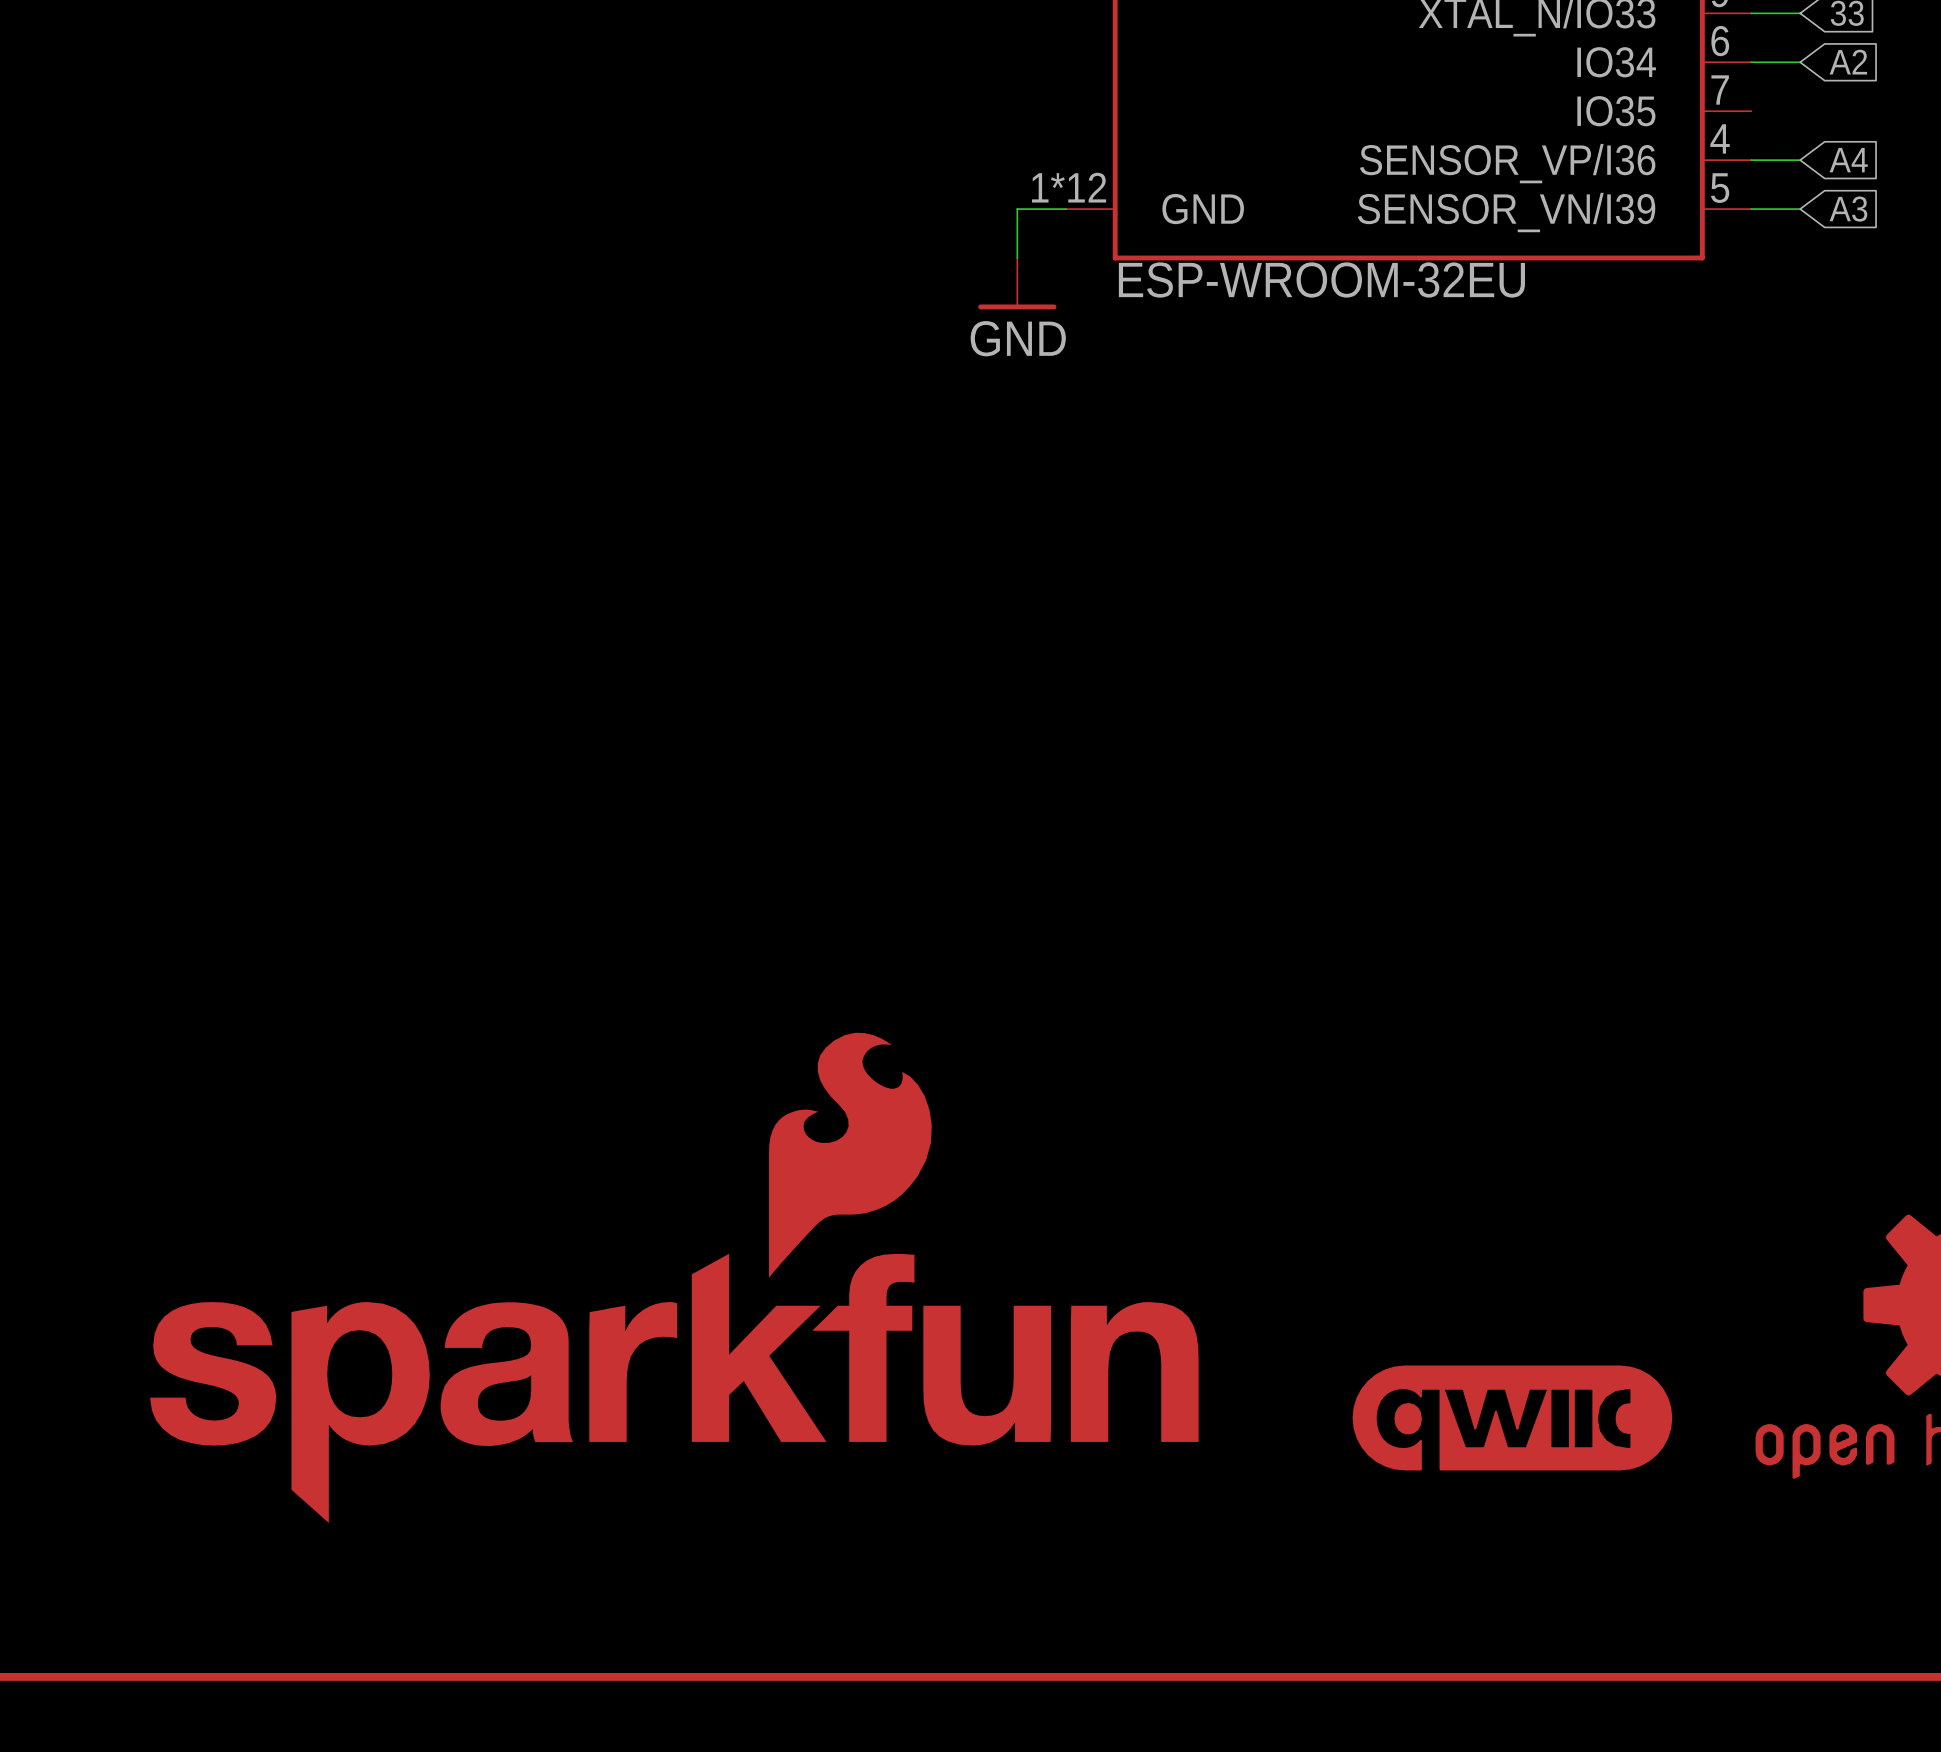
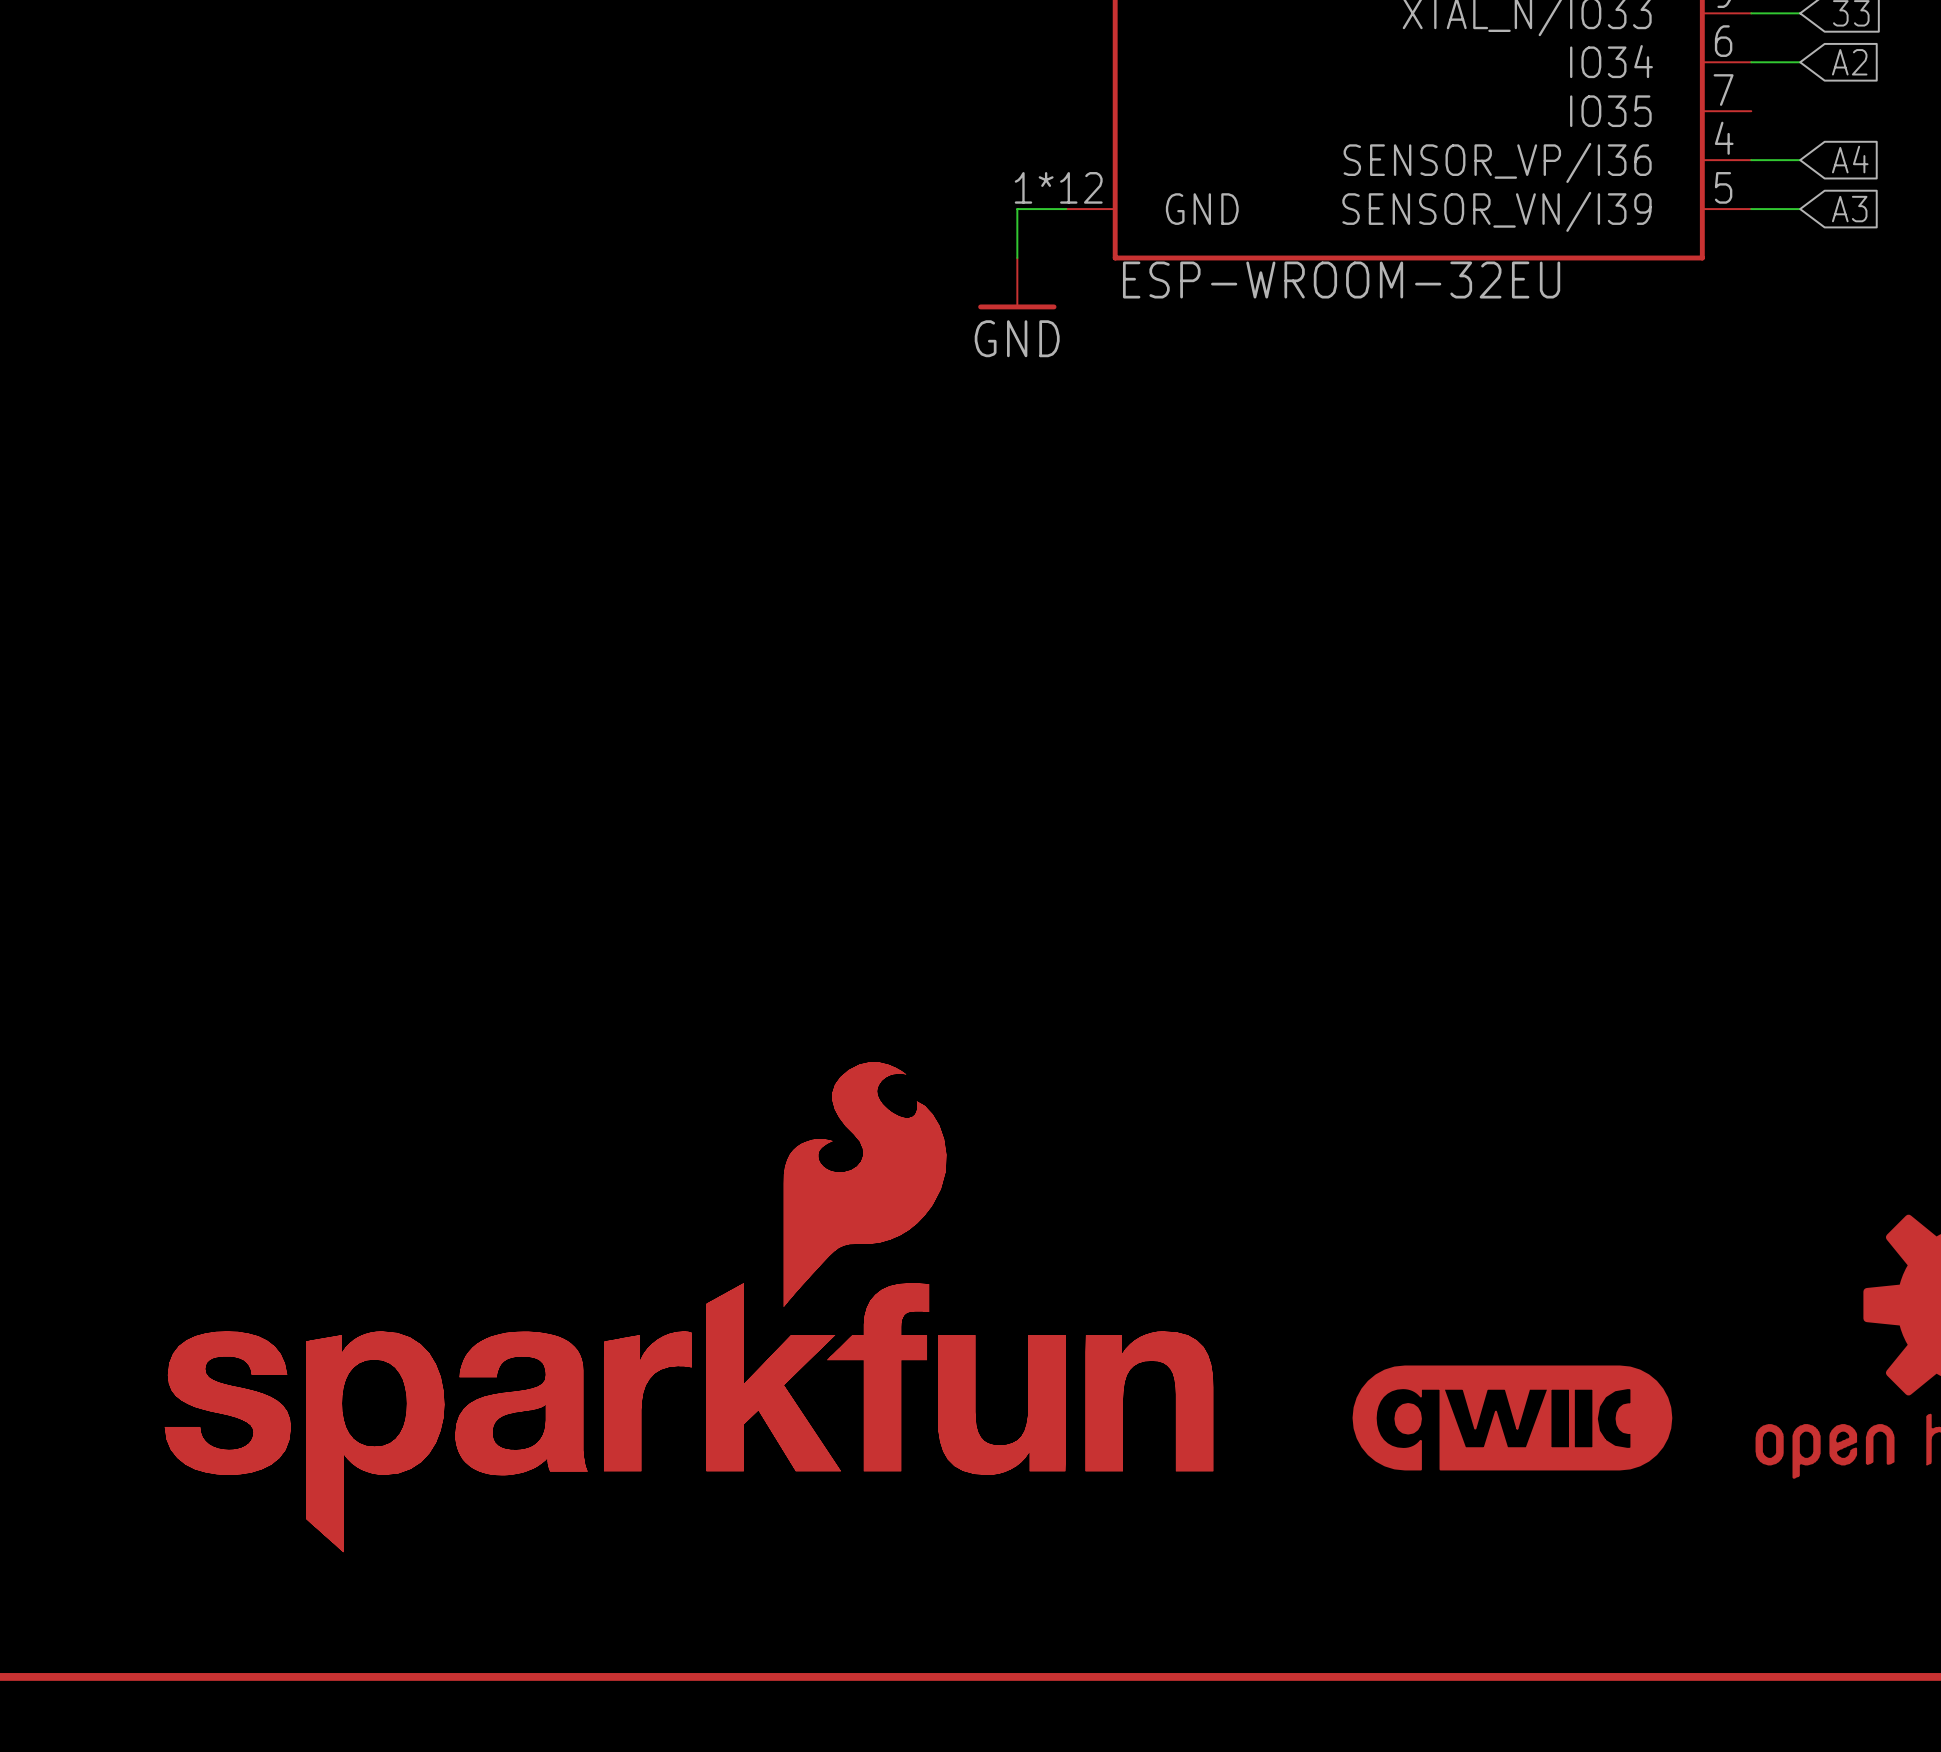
part position: (674, 1277) -> (689, 1307)

